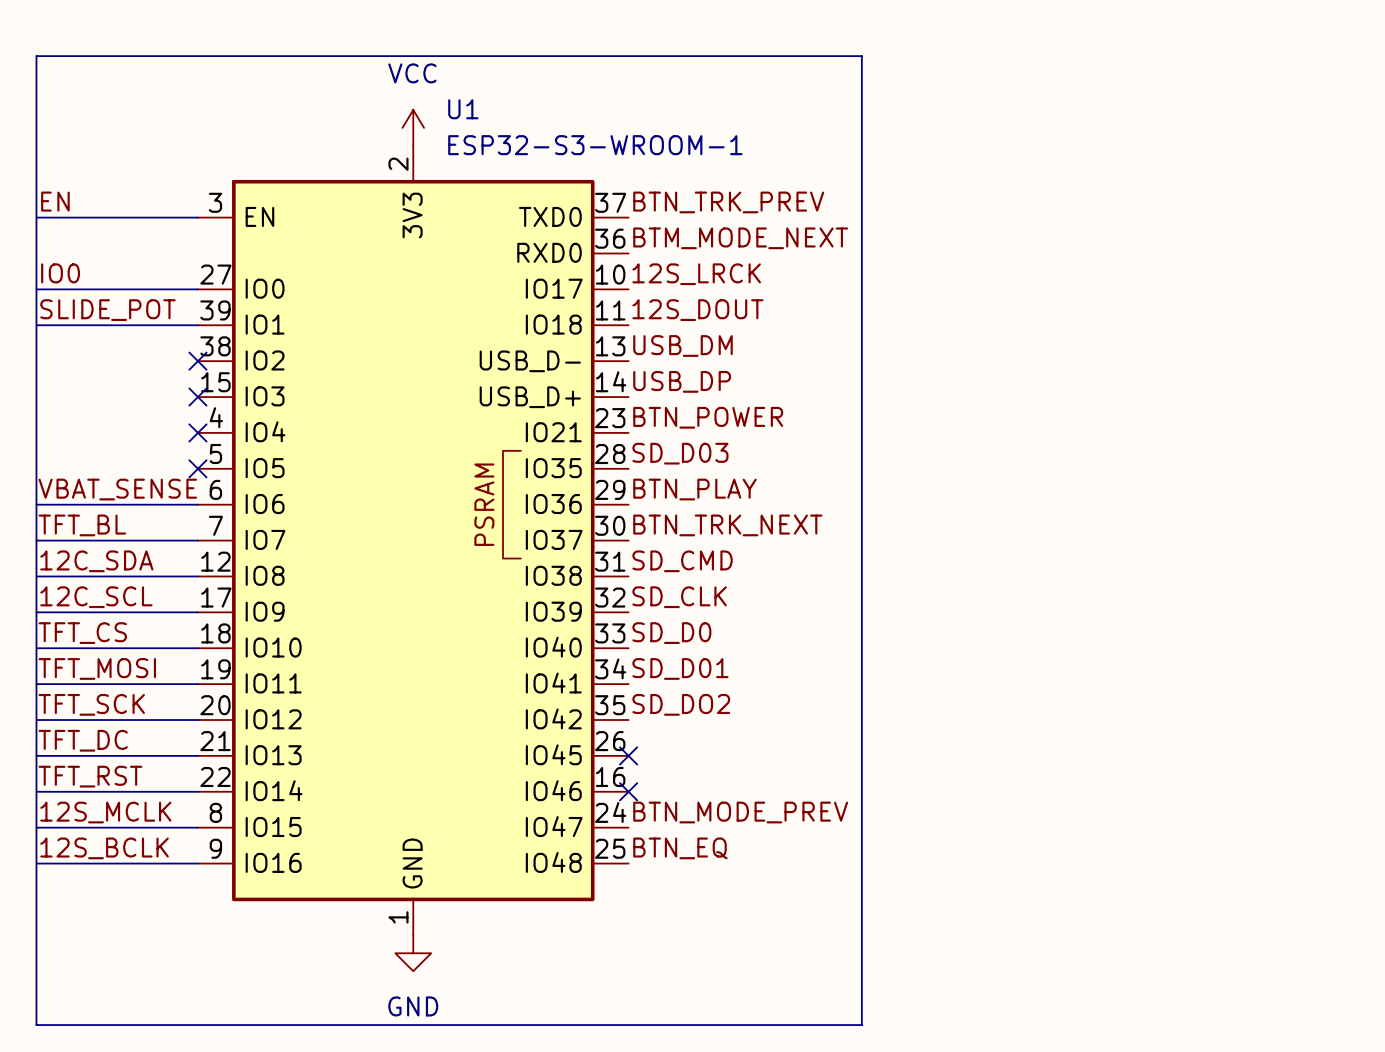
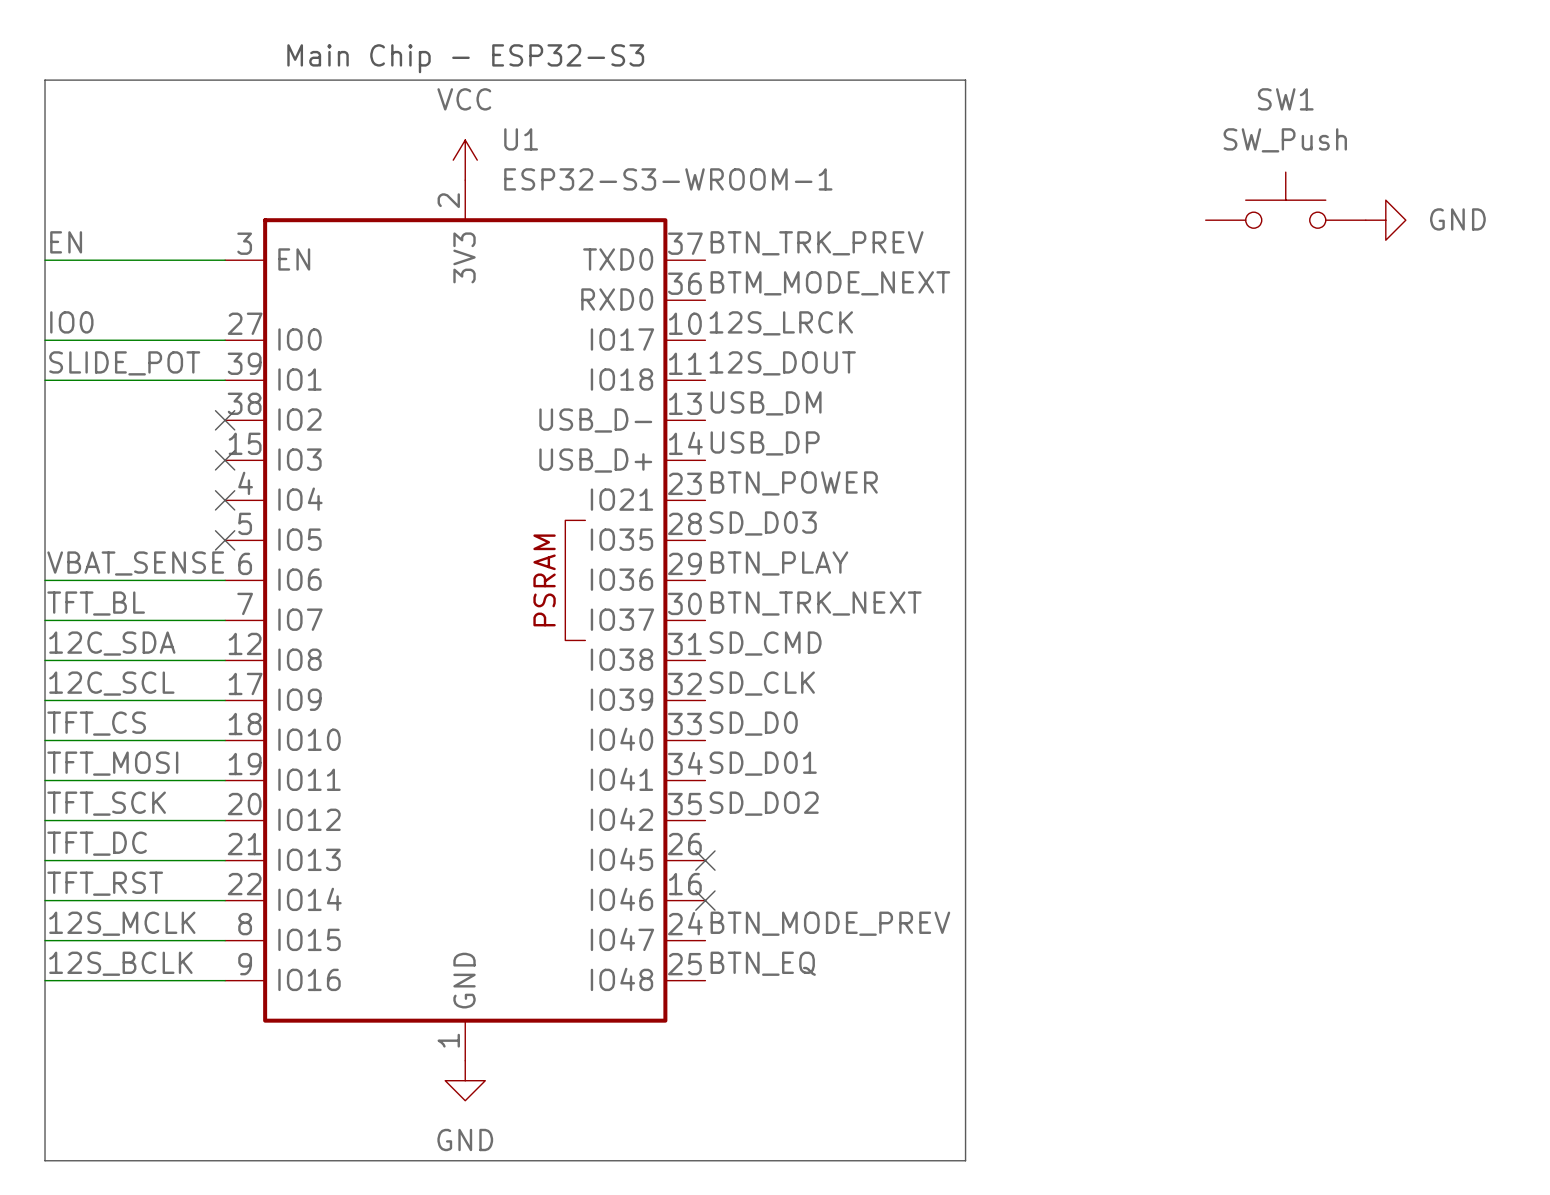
text: none -> Main Chip - ESP32-S3 (465, 58)
SW1: none -> SW_Push (1285, 200)
power symbol: none -> GND (1385, 220)

